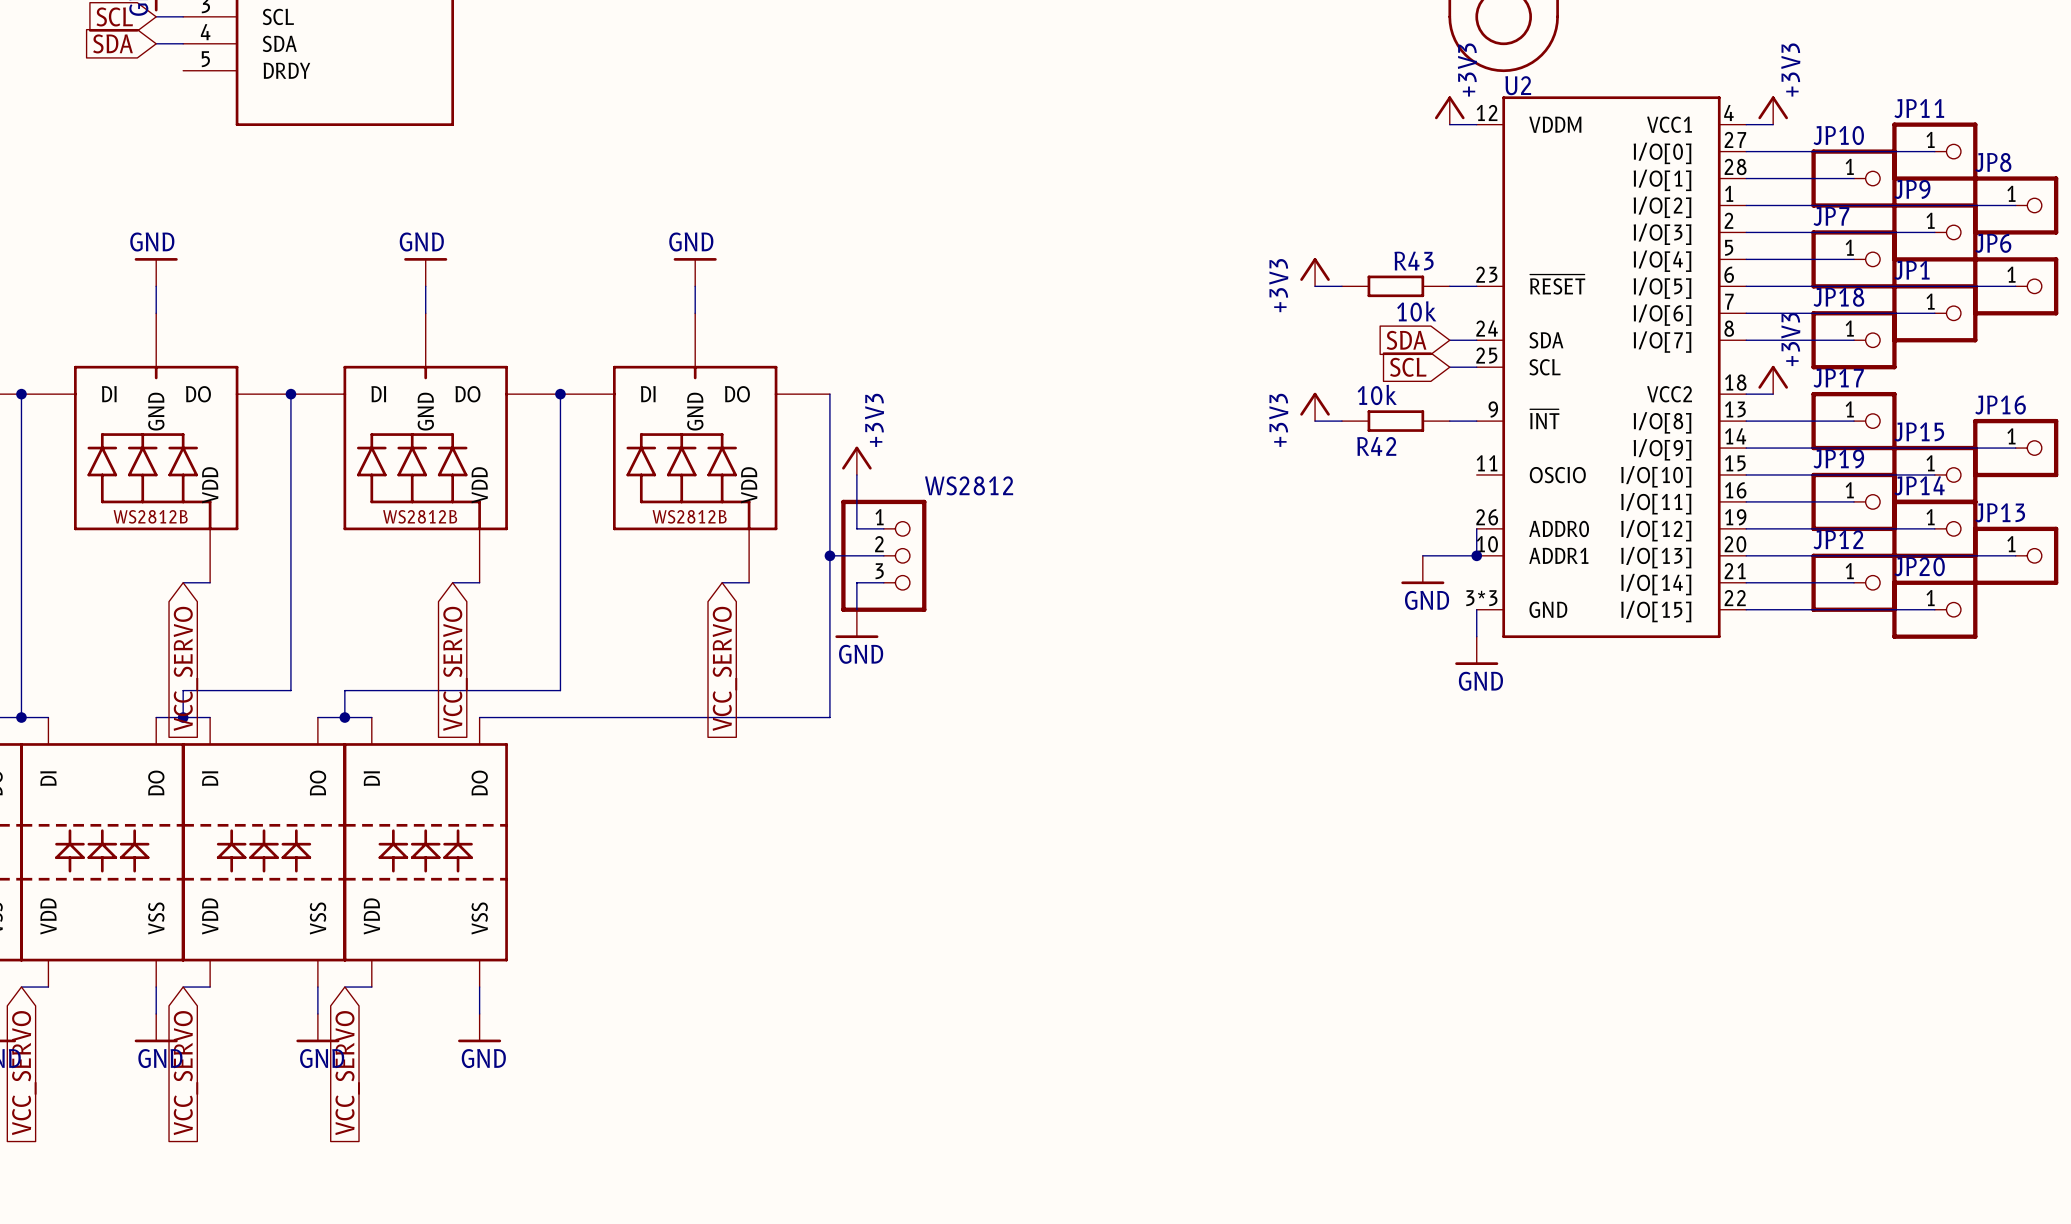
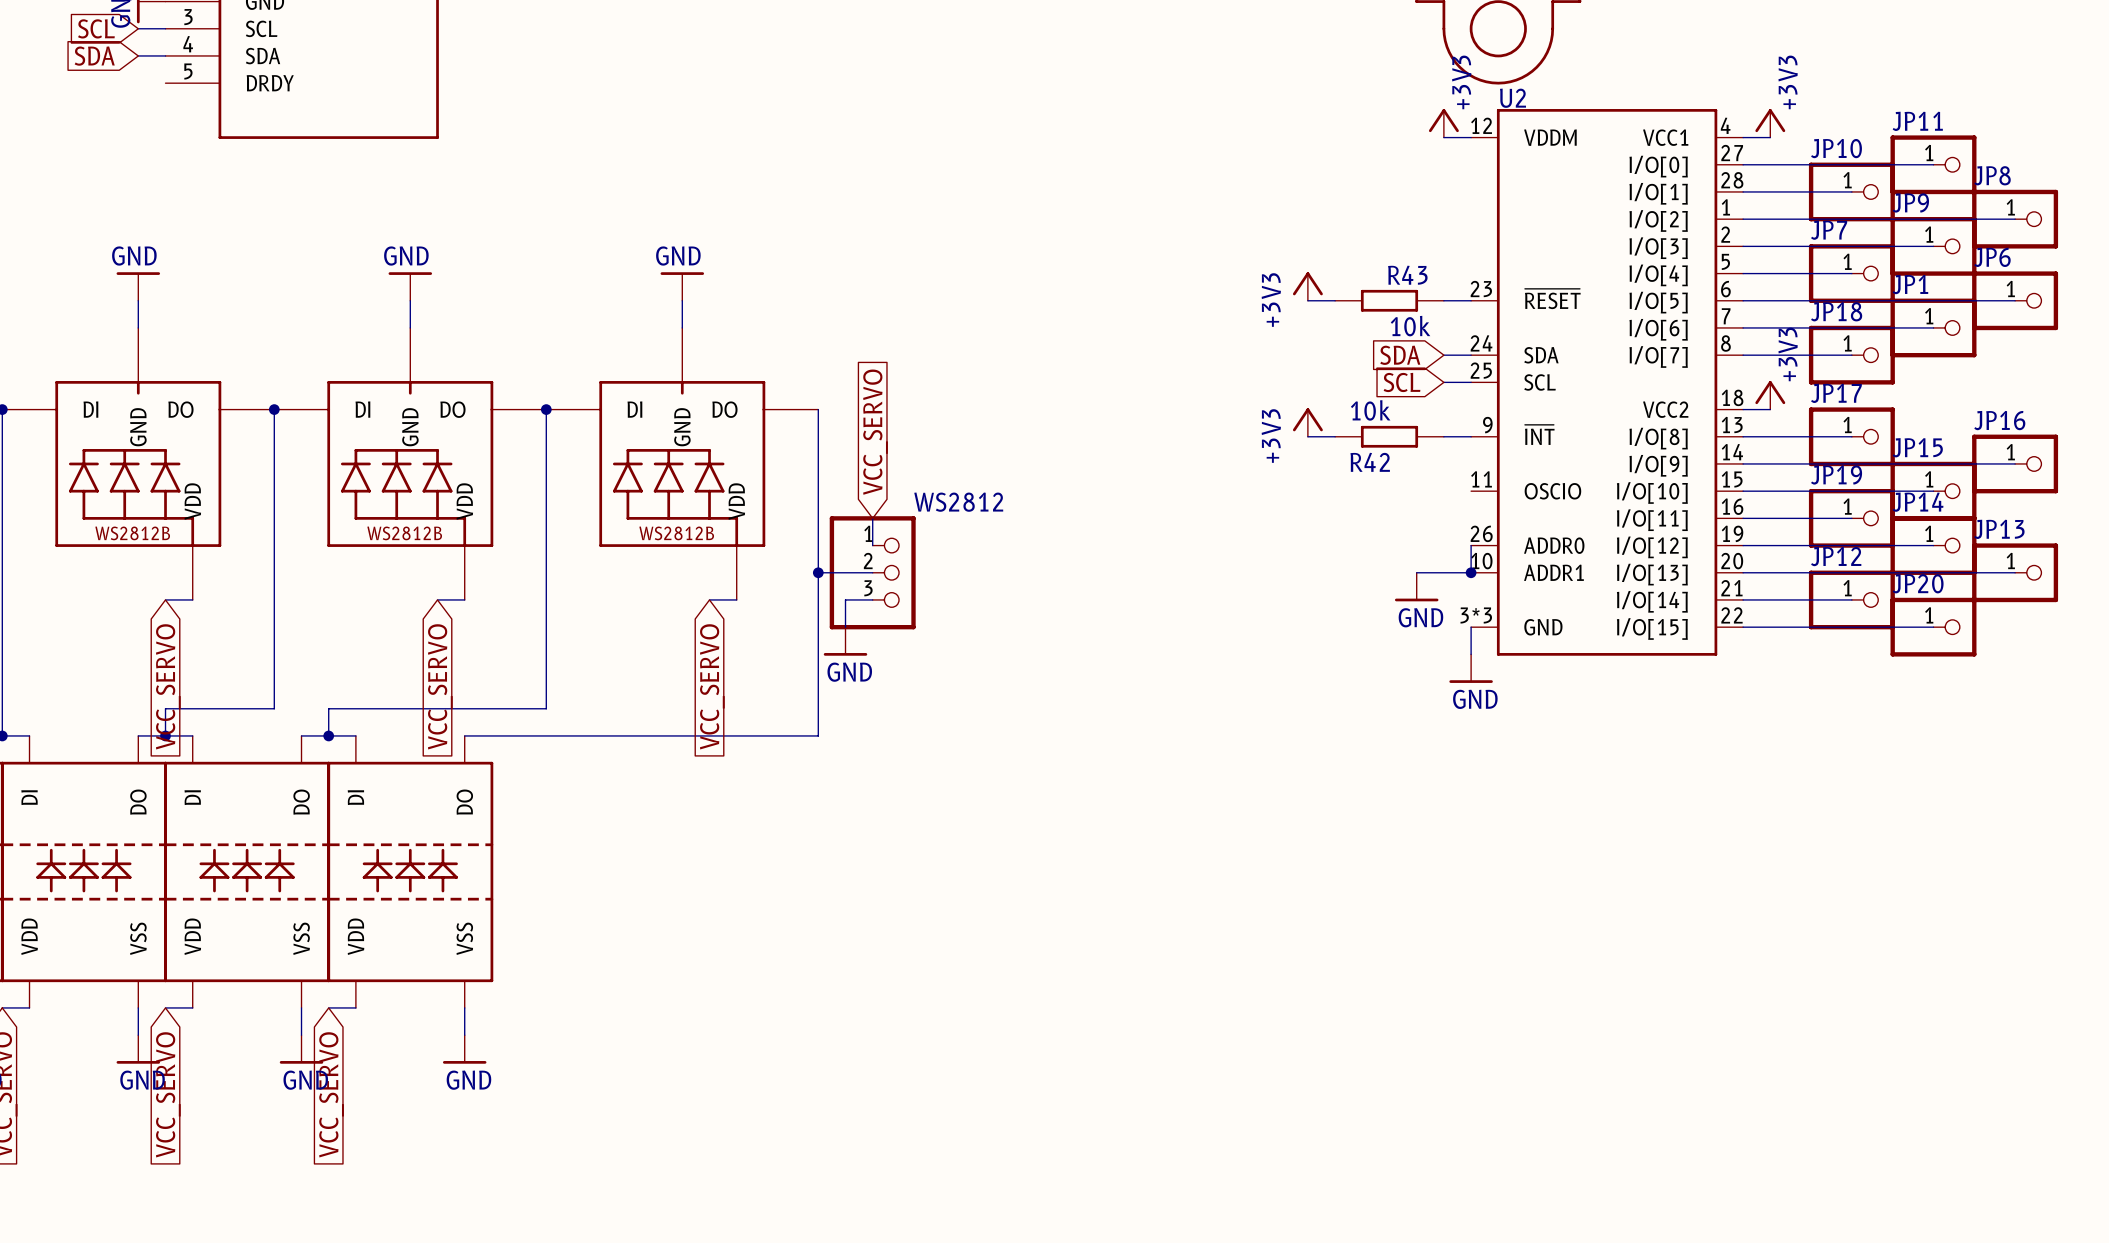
global label: none -> VCC_SERVO (875, 432)
power symbol: +3V3 (856, 460) -> none
wire: (856, 474) (856, 528) (883, 528) -> (872, 518) (872, 545)

